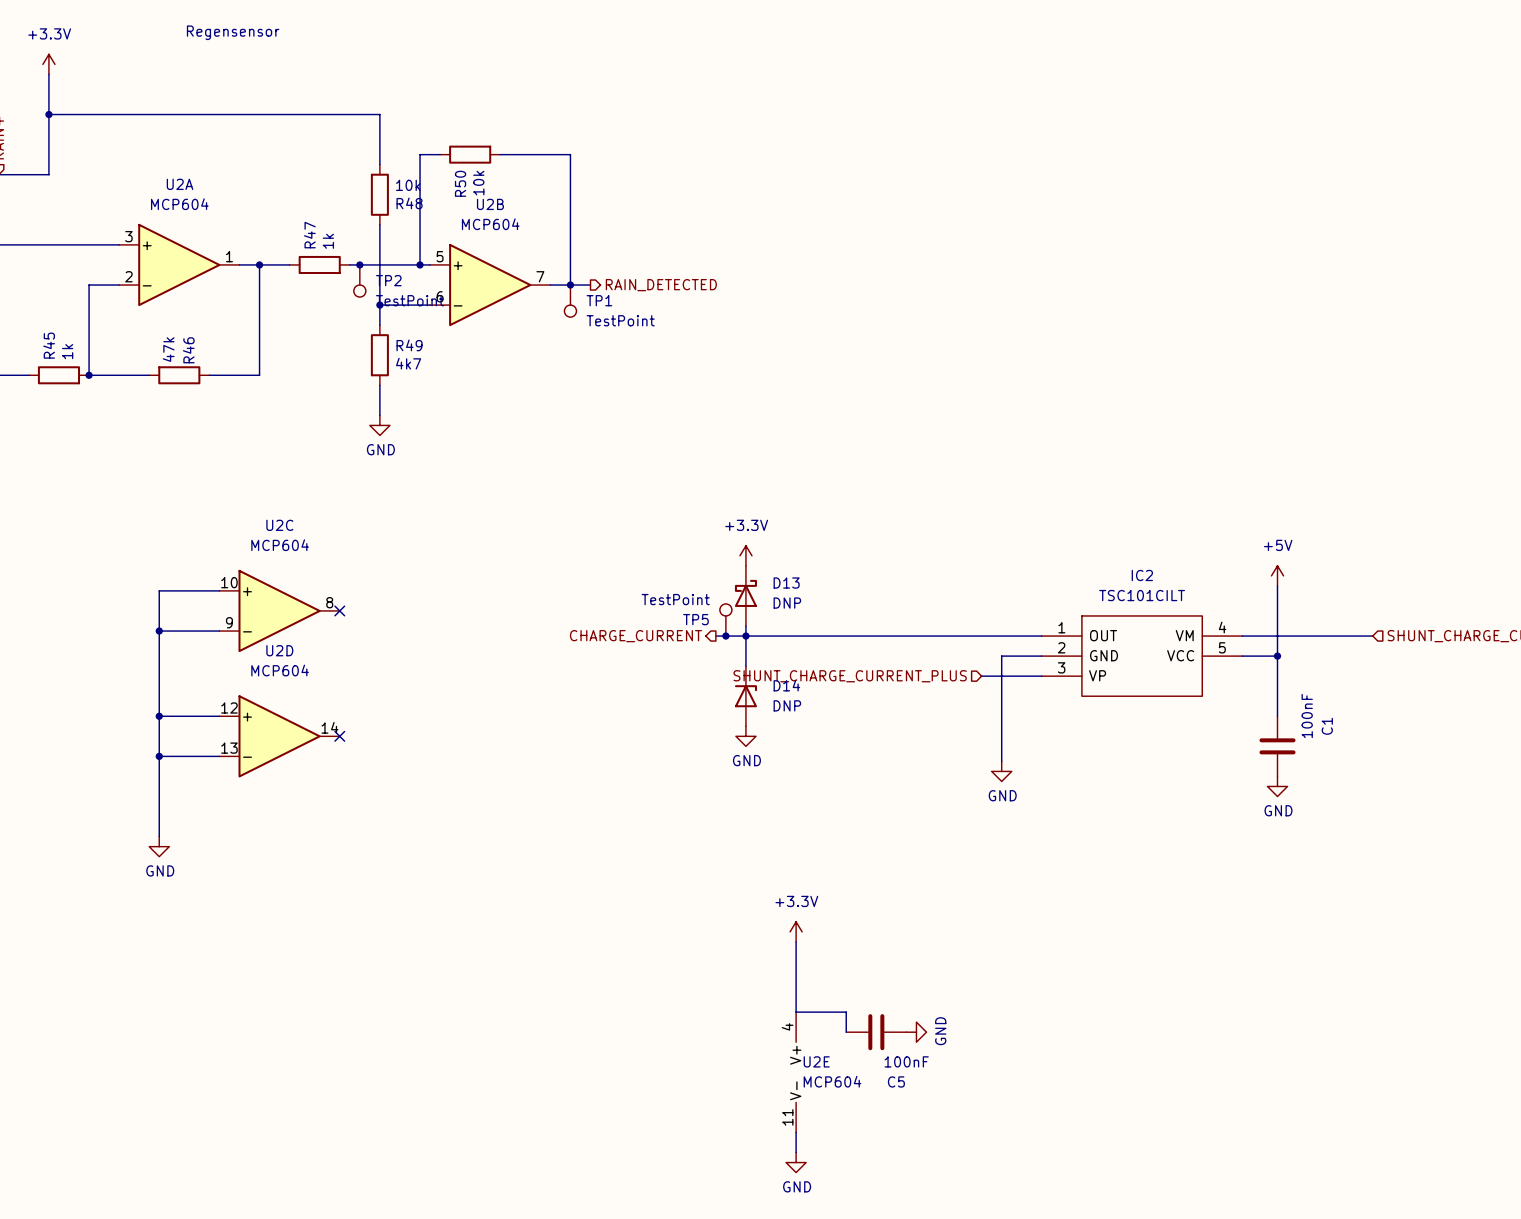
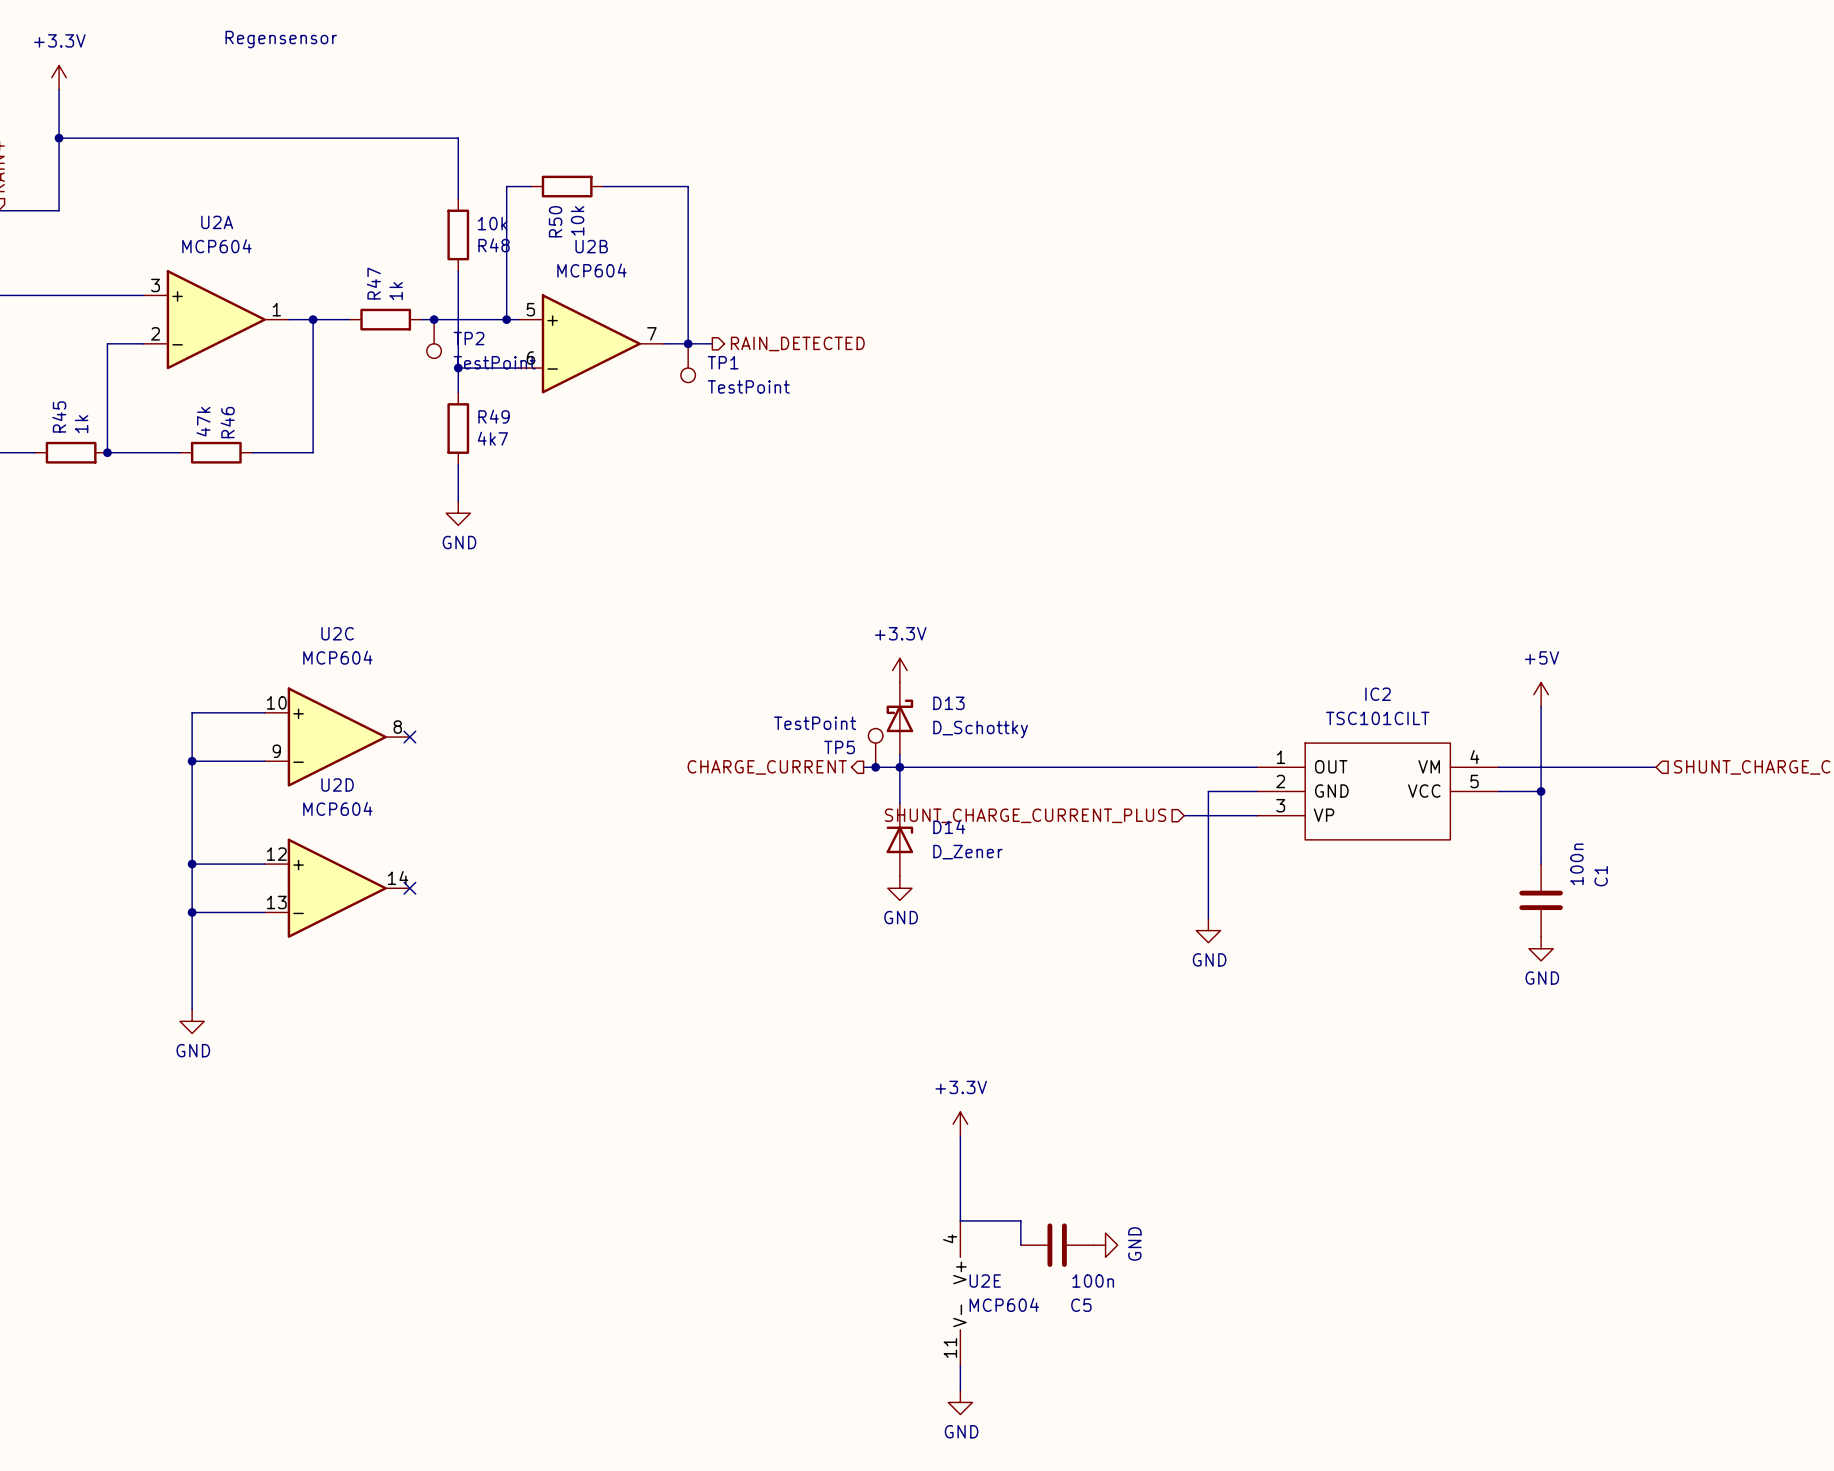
D13 value: DNP (787, 603) -> D_Schottky (980, 729)
D14 value: DNP (787, 705) -> D_Zener (967, 852)
C1 value: 100nF (1307, 716) -> 100n (1576, 864)
C5 value: 100nF (906, 1061) -> 100n (1093, 1281)

